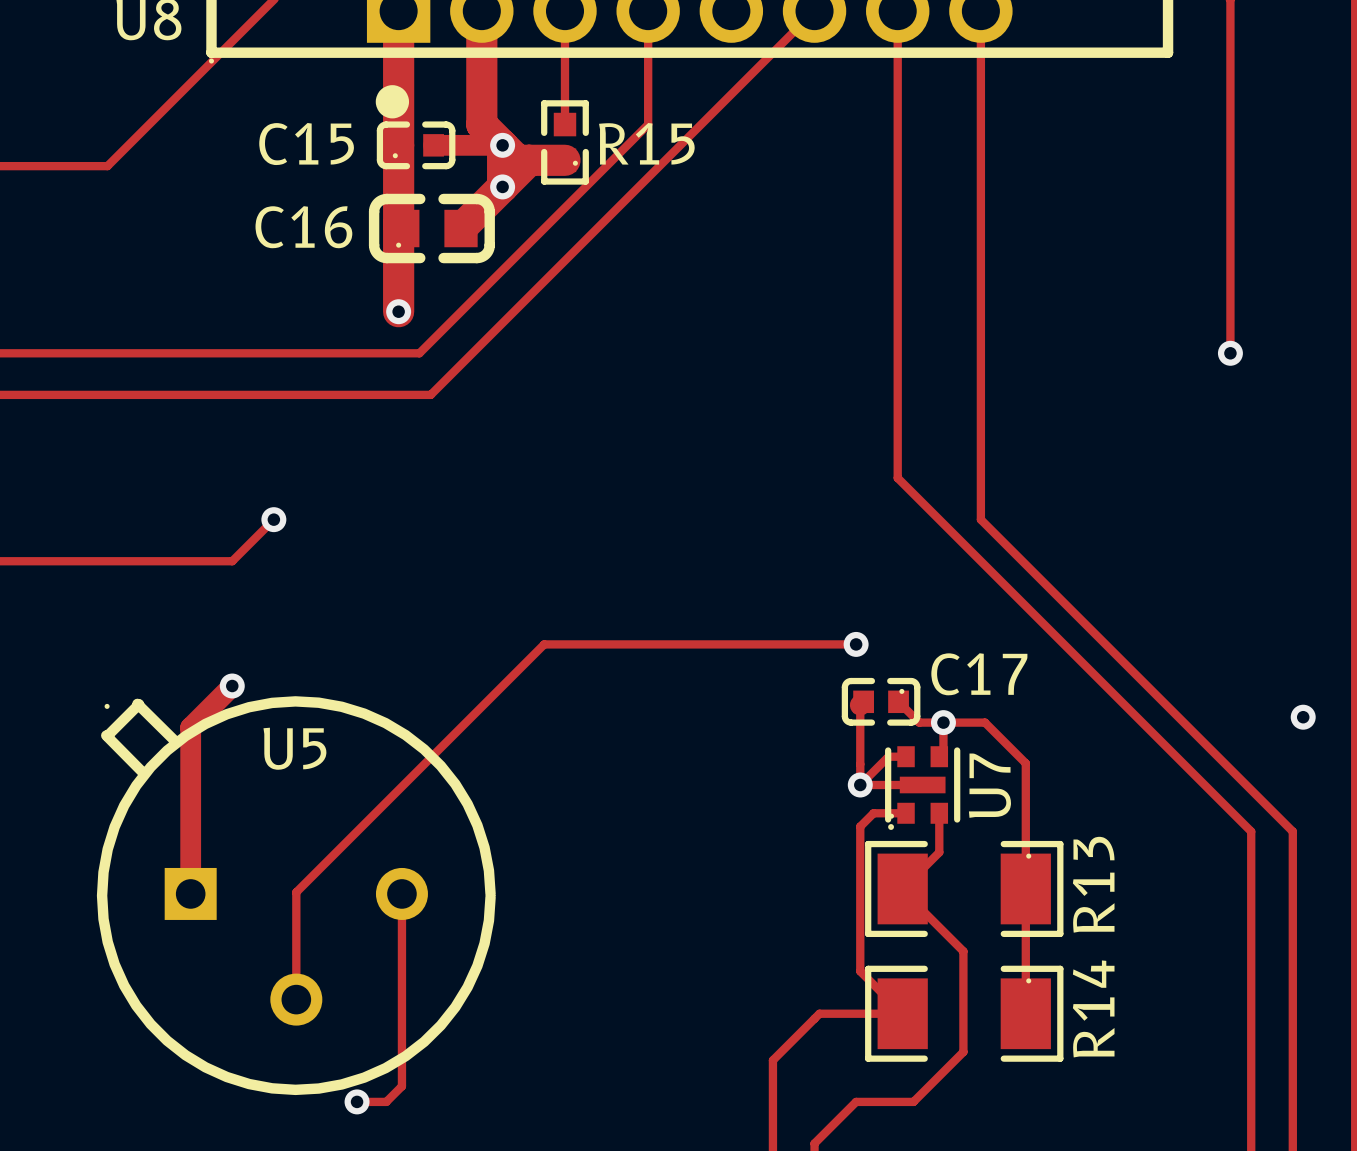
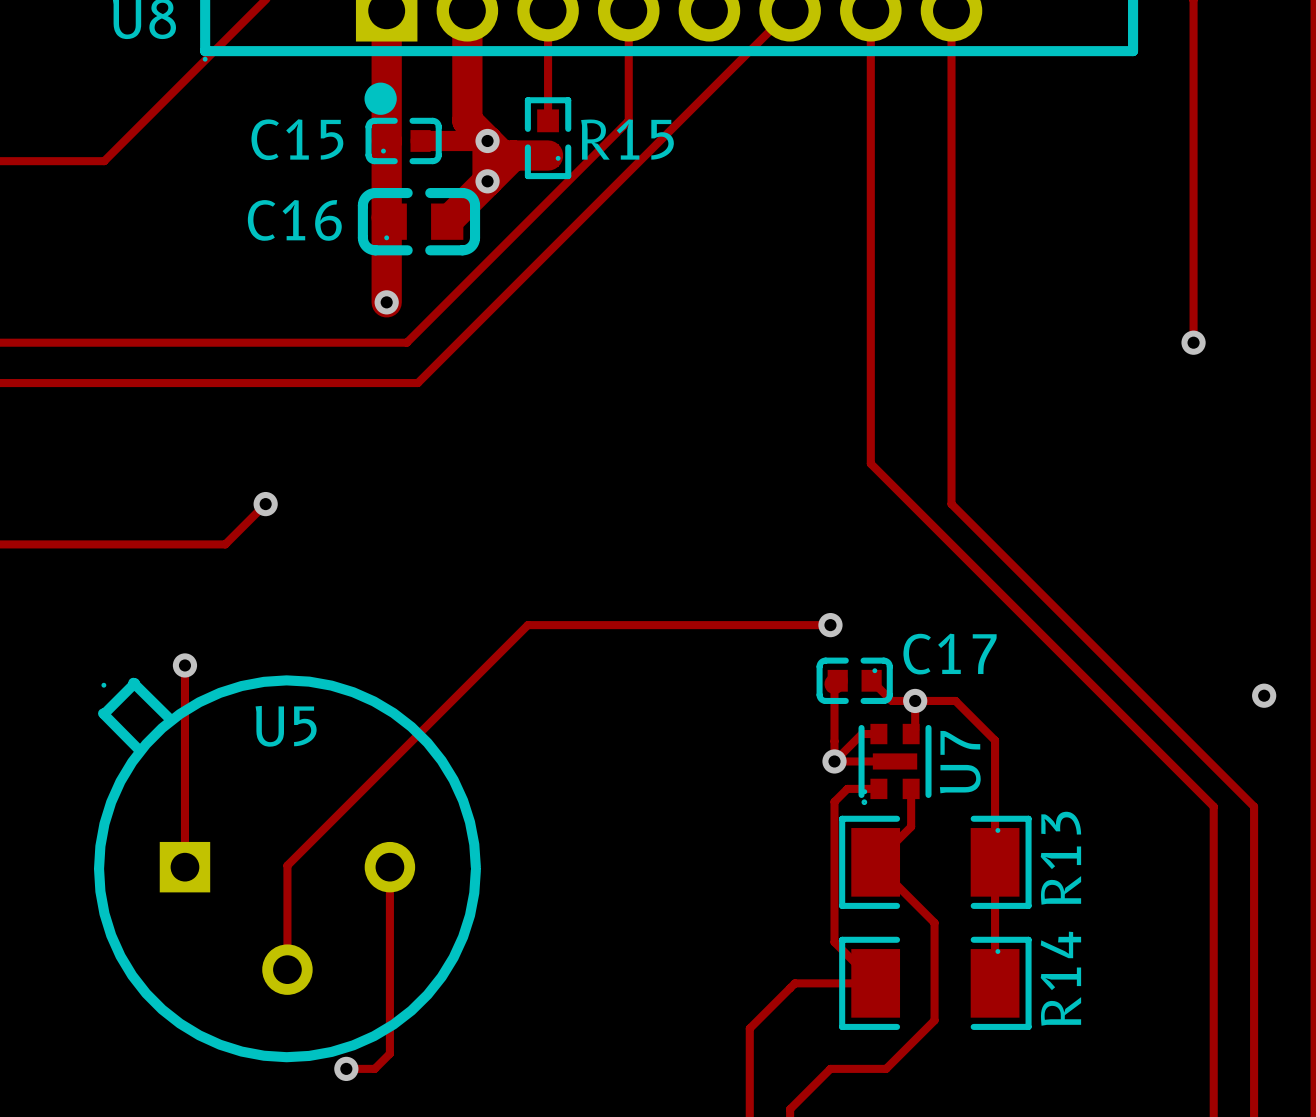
via: none -> (184, 665)
track: (232, 686) (190, 727) -> (184, 665) (184, 705)
via: (232, 686) -> none
track width: thick (190, 727) (190, 893) -> thin (184, 705) (184, 867)

